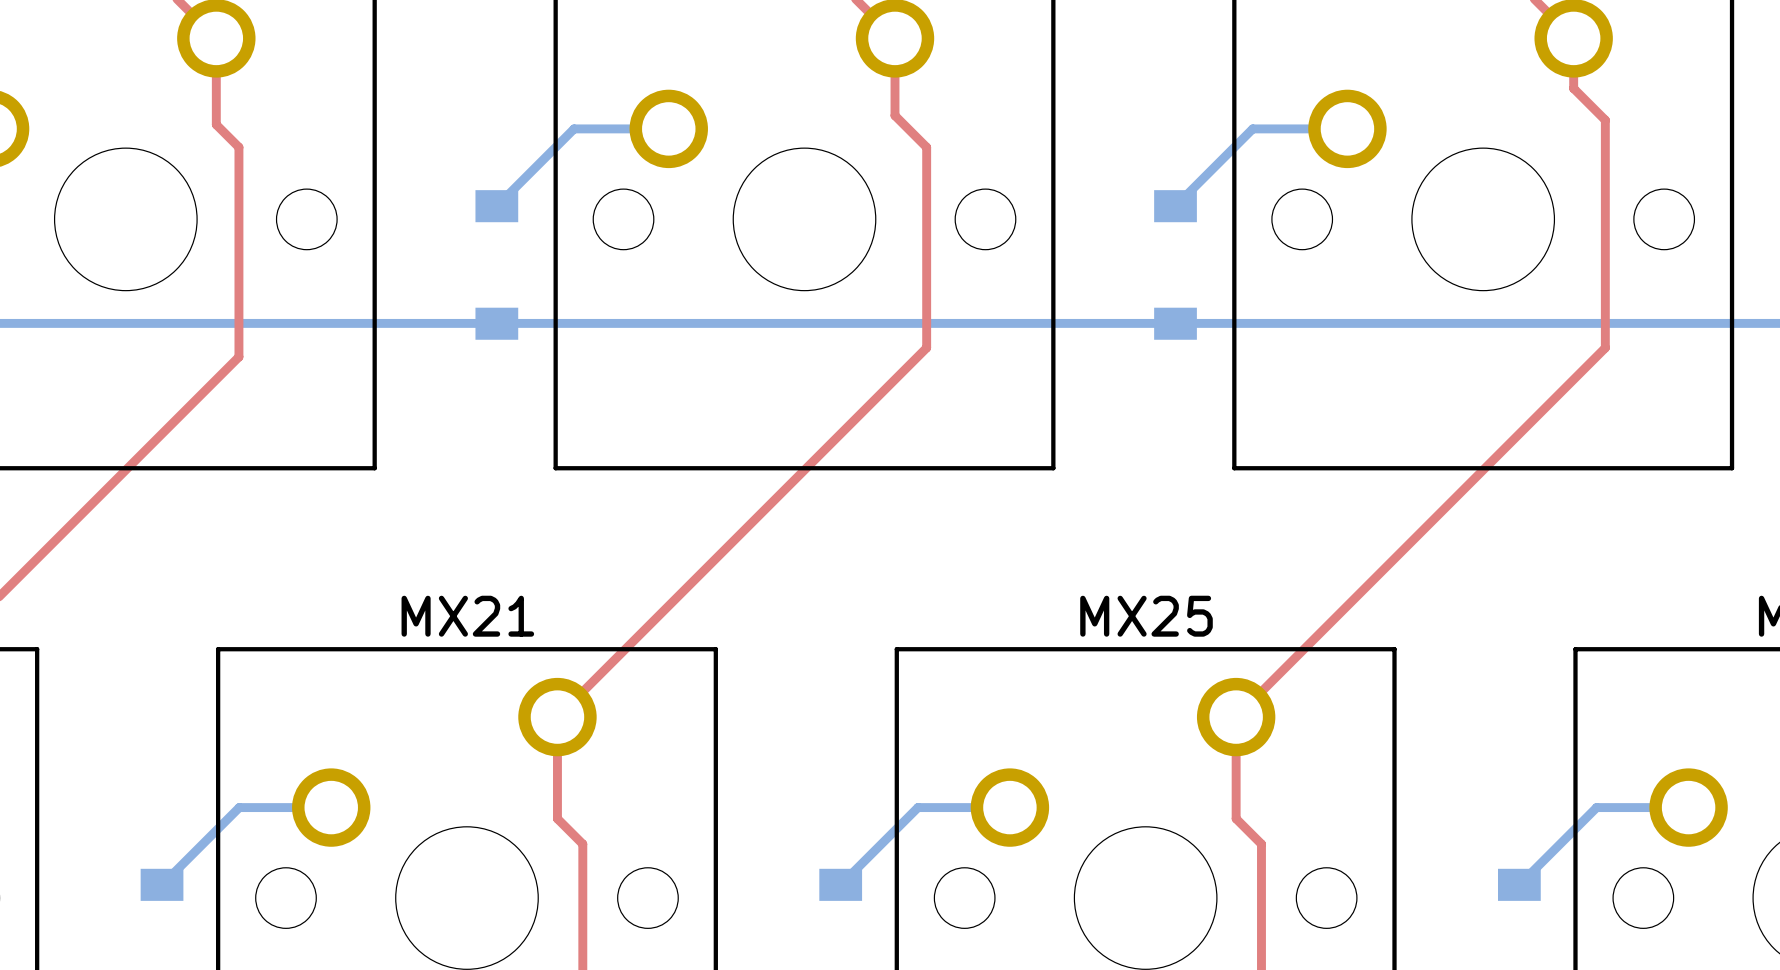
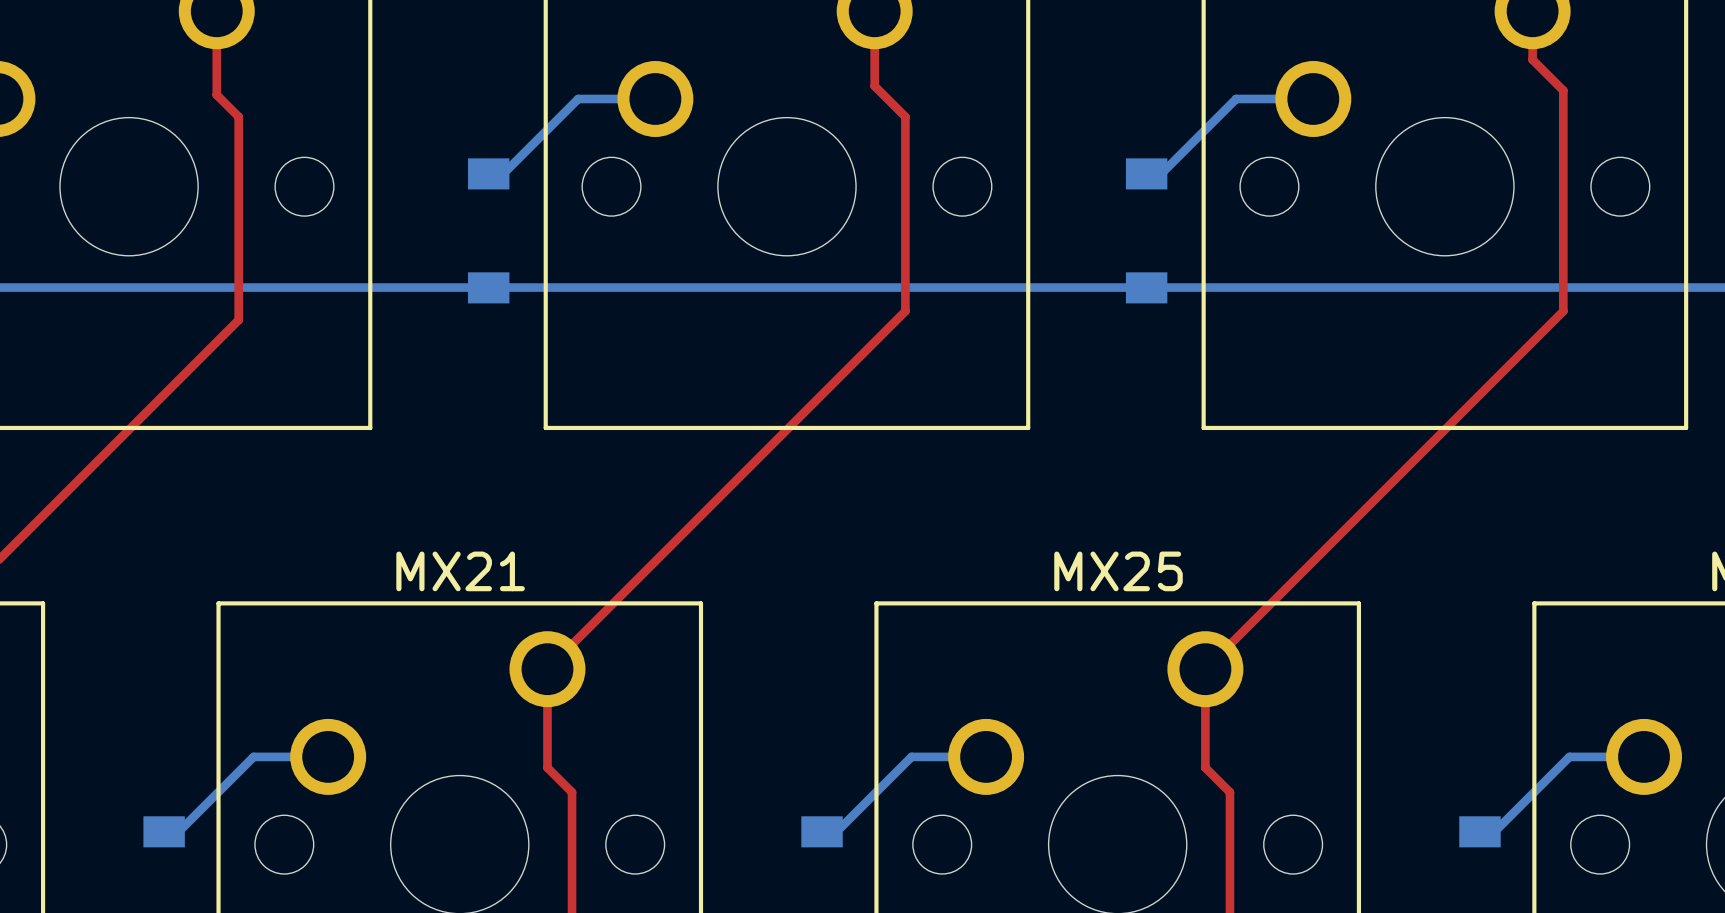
bottom track: (589, 128) (574, 128) (496, 206) -> (578, 98) (503, 173)
bottom track: (1267, 128) (1252, 128) (1175, 206) -> (1236, 98) (1161, 173)
bottom track: (254, 807) (239, 807) (162, 884) -> (253, 756) (179, 831)
bottom track: (933, 807) (917, 807) (840, 884) -> (911, 756) (836, 831)
bottom track: (1611, 807) (1596, 807) (1519, 884) -> (1569, 756) (1494, 831)

